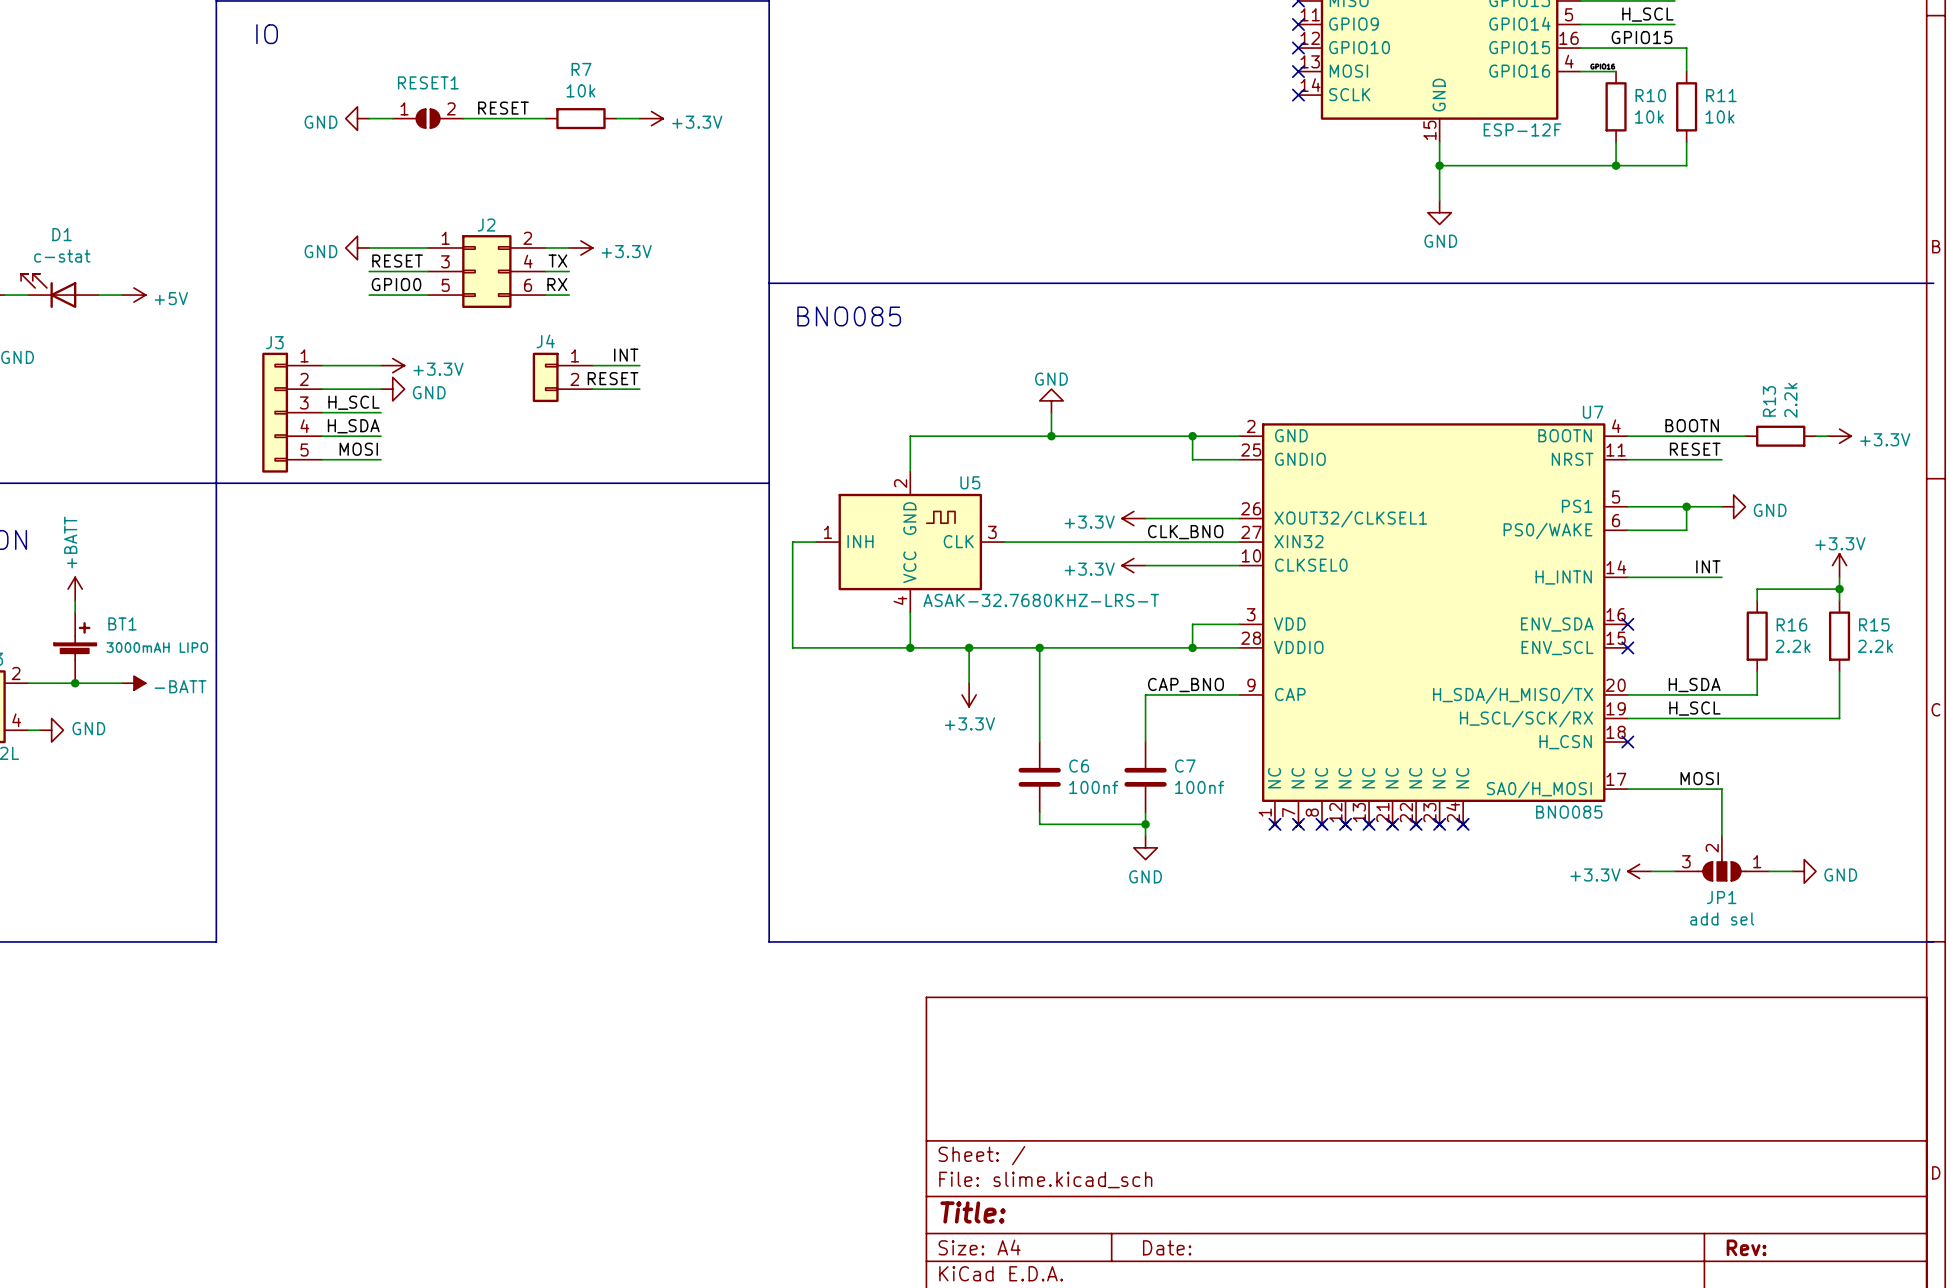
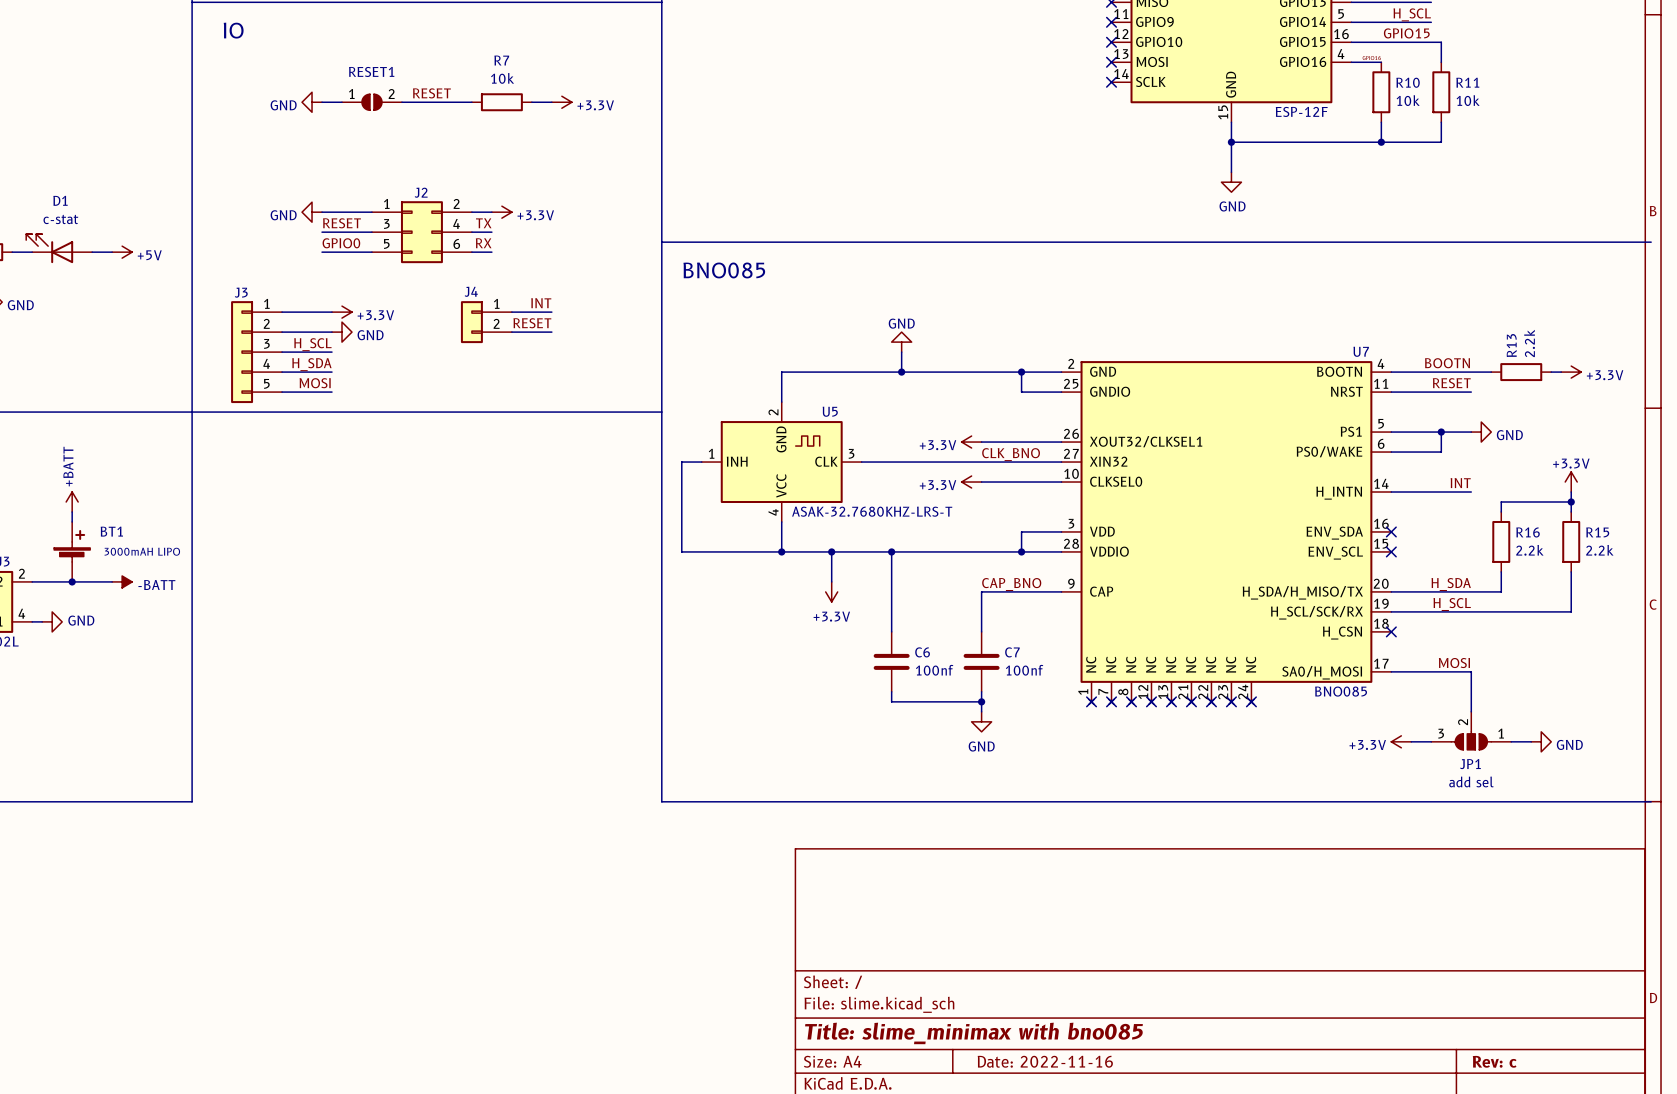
title block: Title: (973, 1212) -> Title: slime_minimax with bno085 (973, 1033)
title block: Date: (1167, 1247) -> Date: 2022-11-16 (1045, 1061)
title block: Rev: (1746, 1247) -> Rev: c (1494, 1061)

